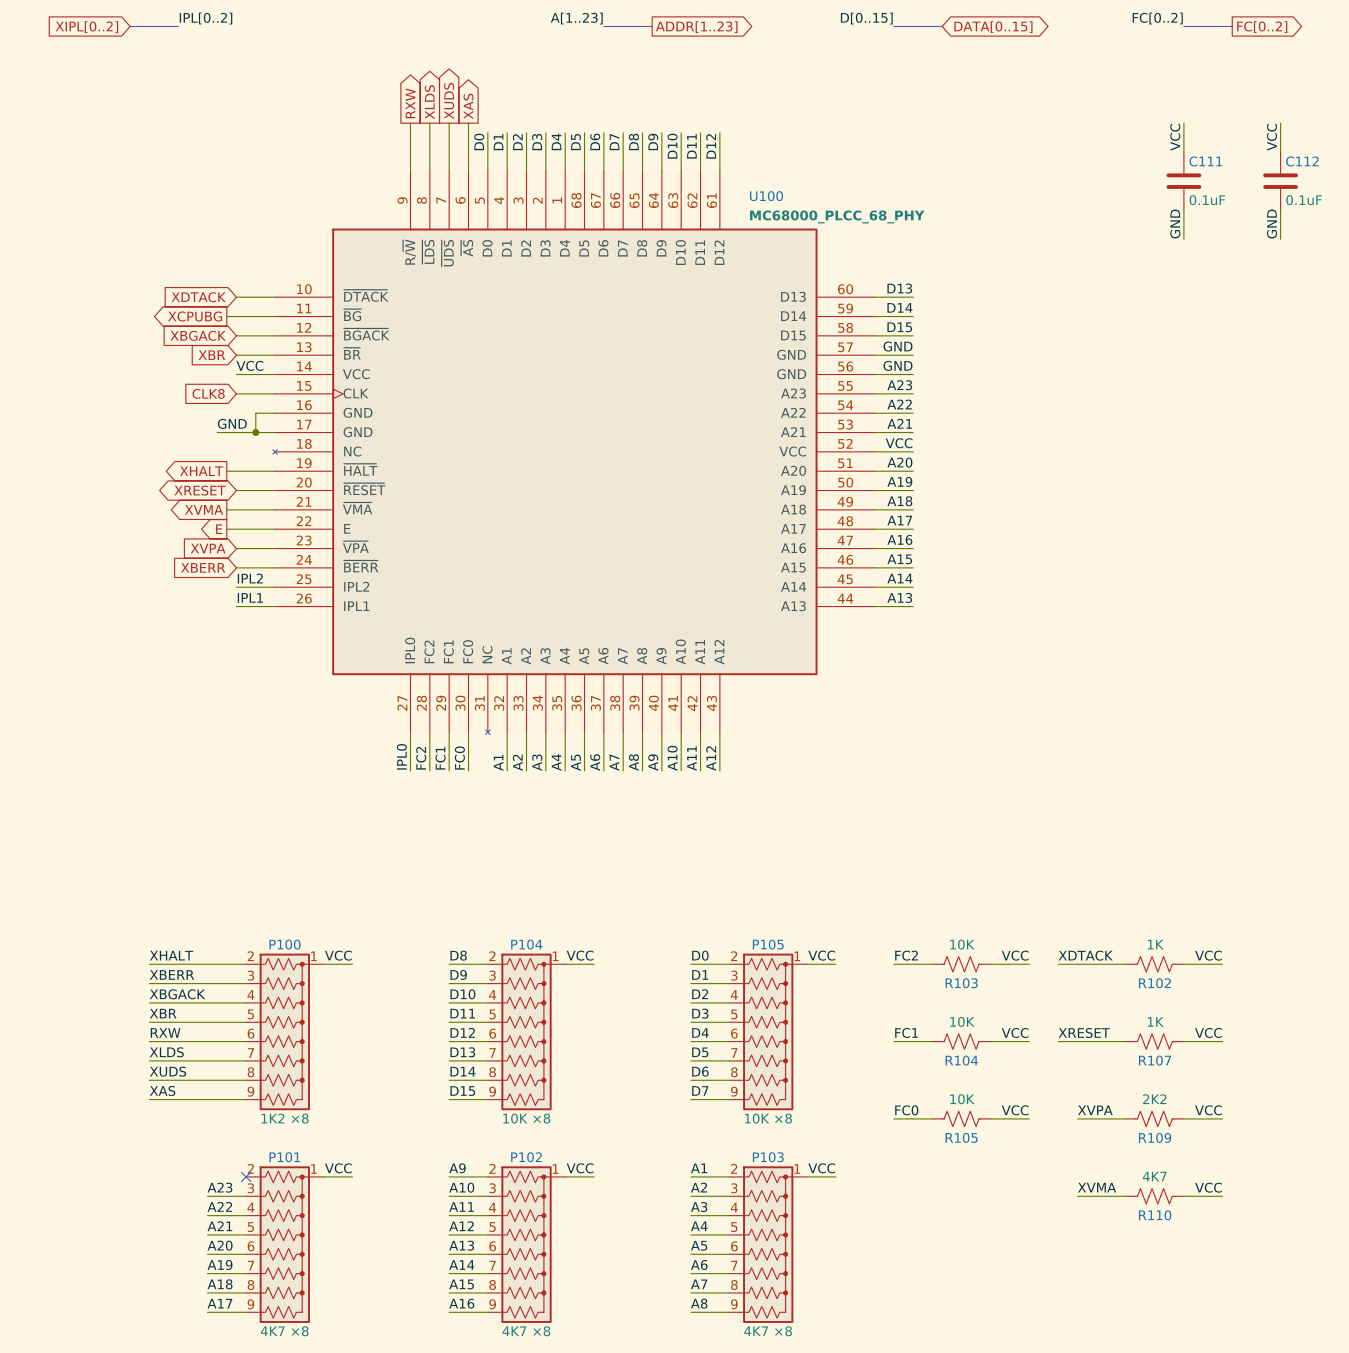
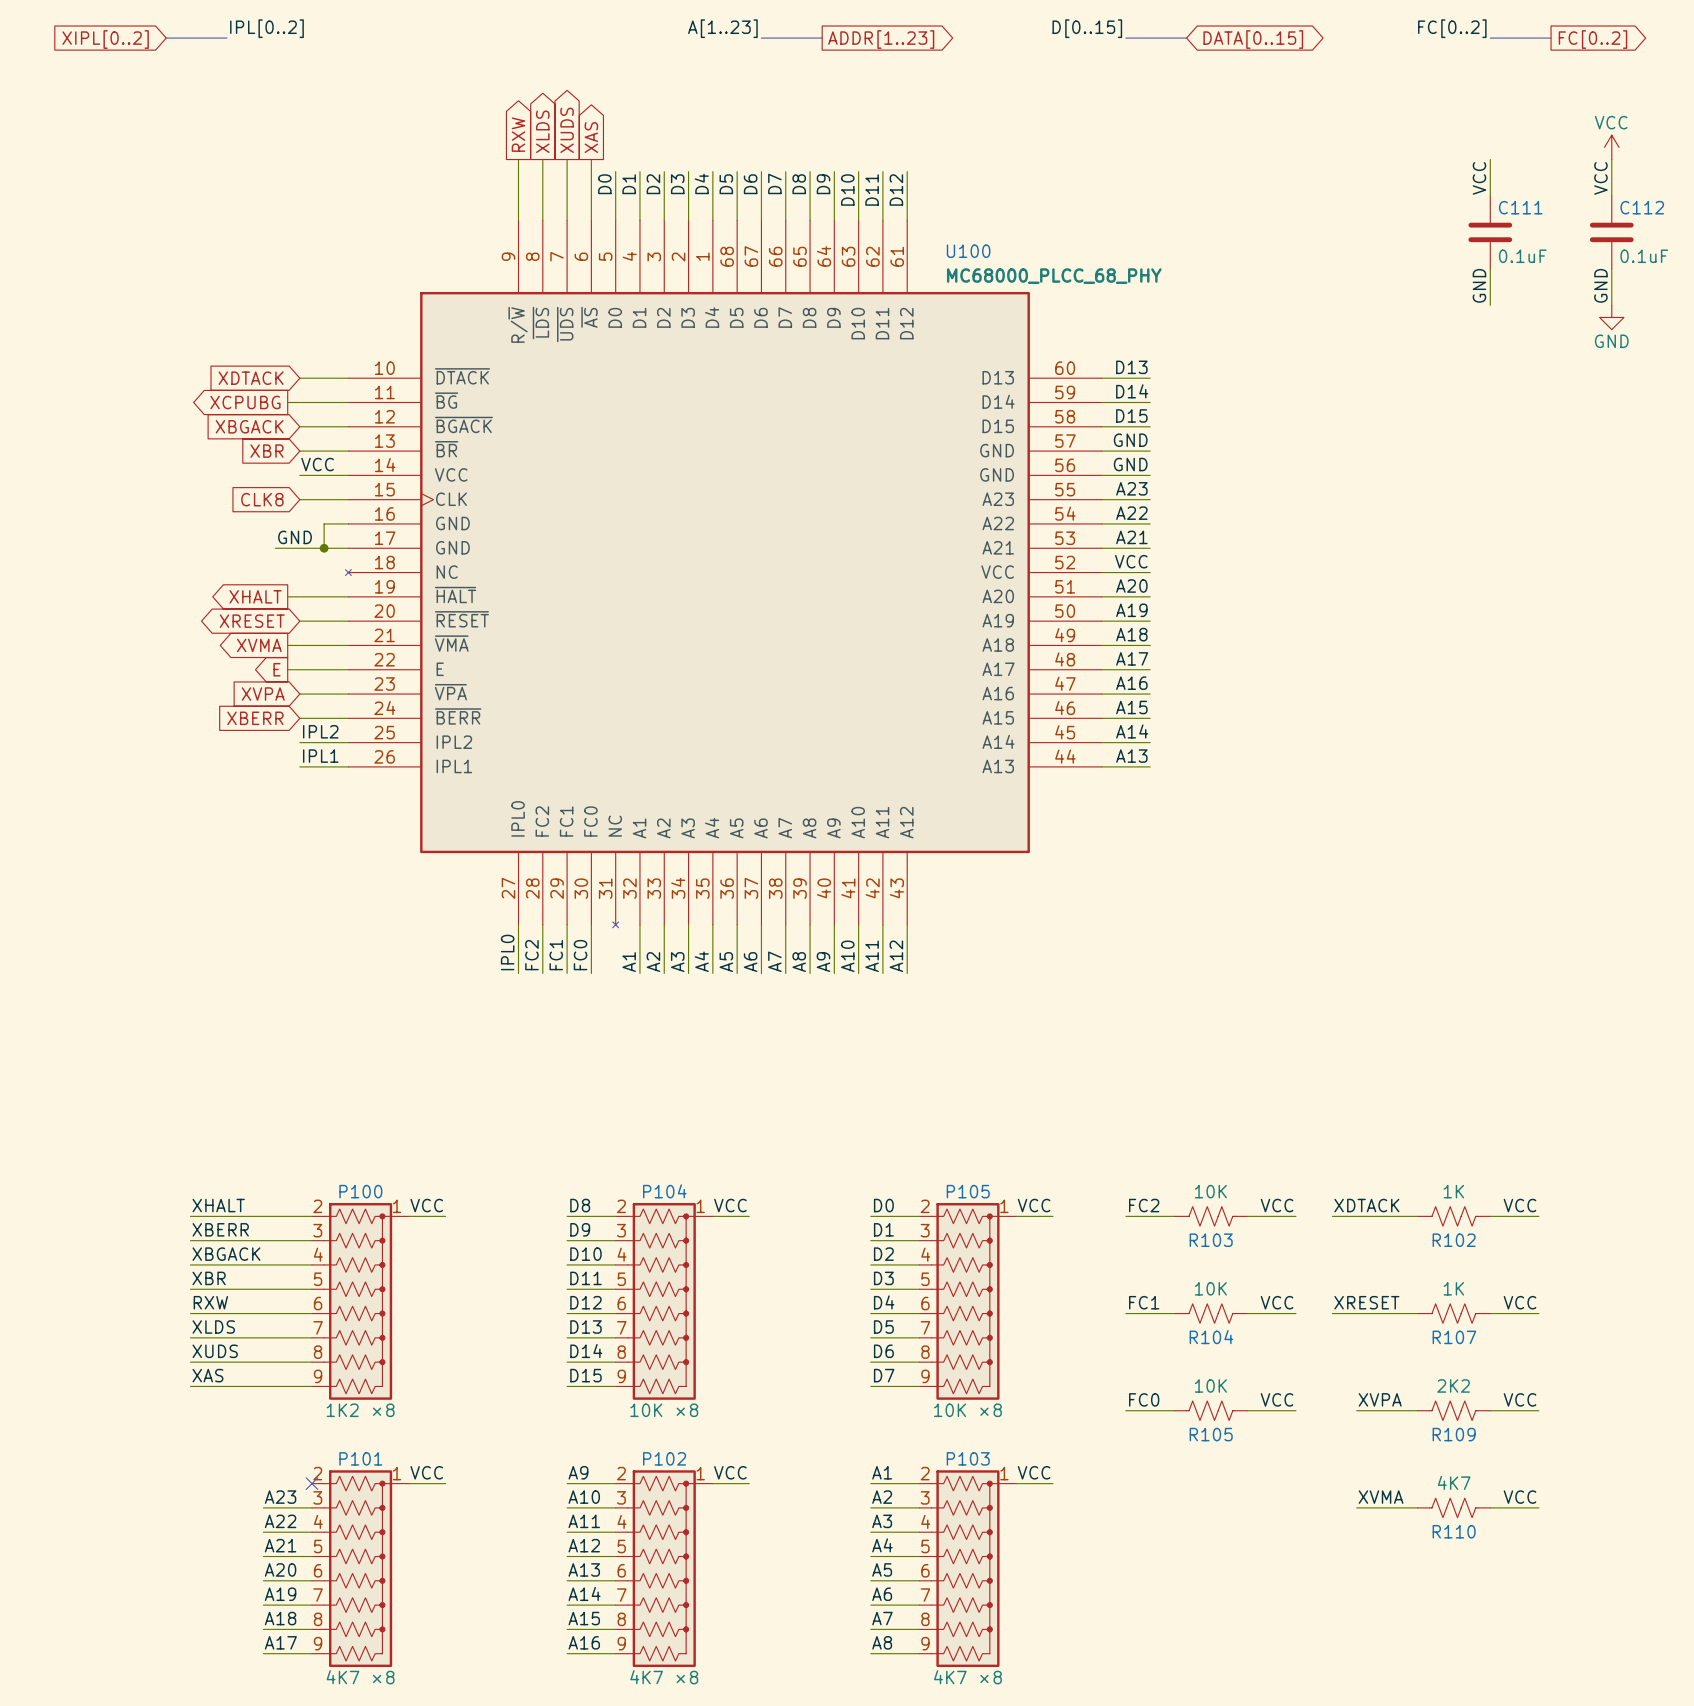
power symbol: none -> VCC (1611, 147)
power symbol: none -> GND (1611, 317)

